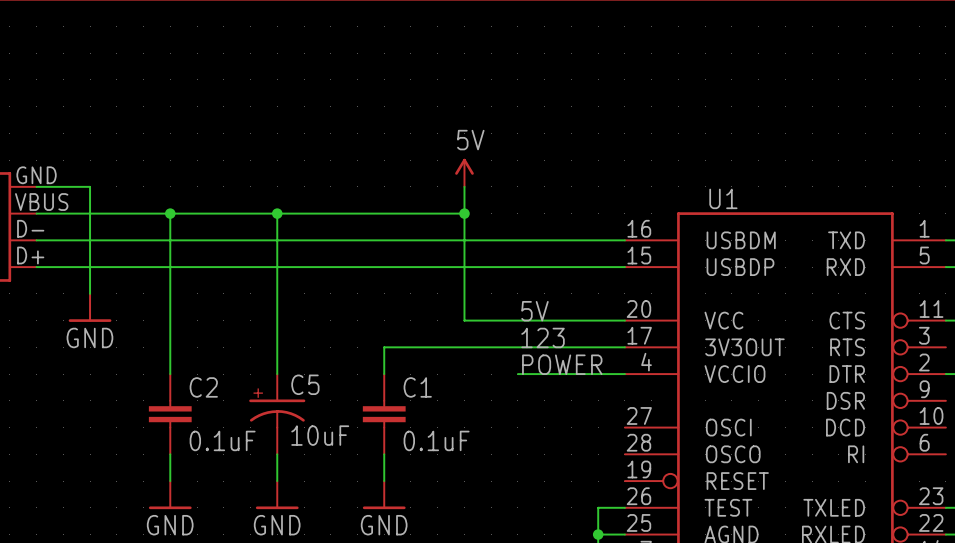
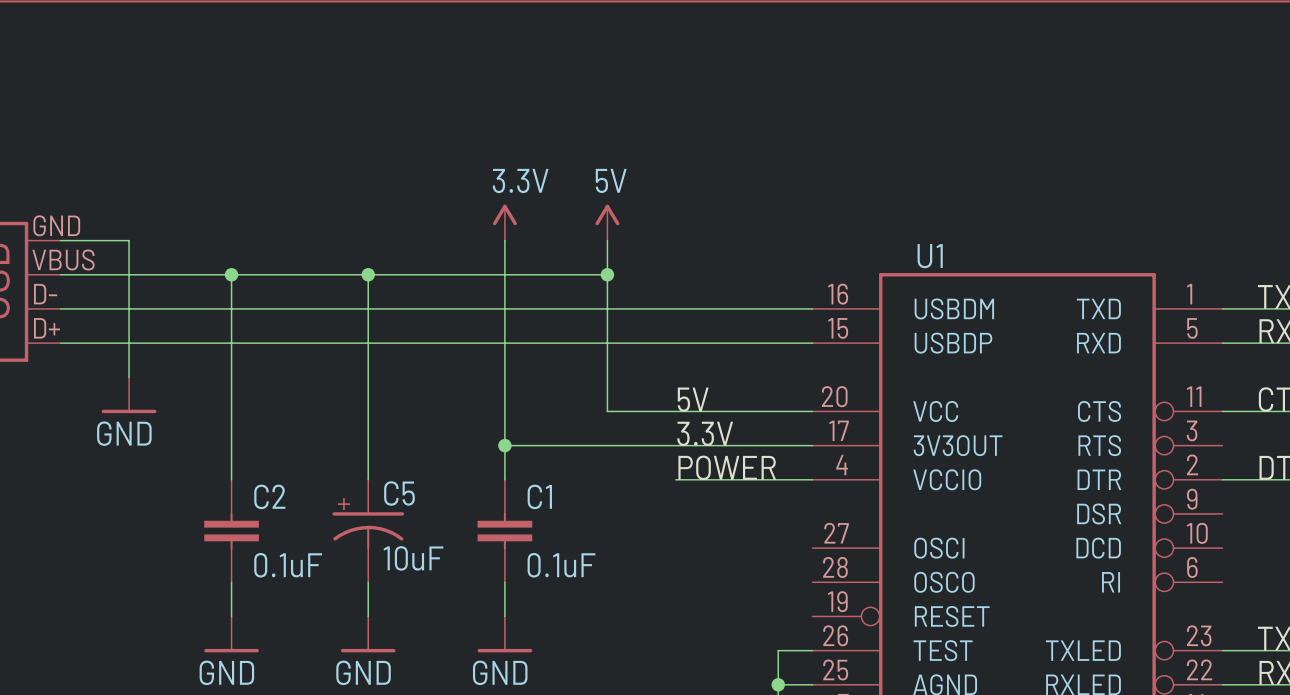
power symbol: none -> 3.3V (504, 222)
wire: none -> (504, 240) (504, 445)
label: 123 (543, 337) -> 3.3V (705, 433)
junction: none -> (504, 445)

